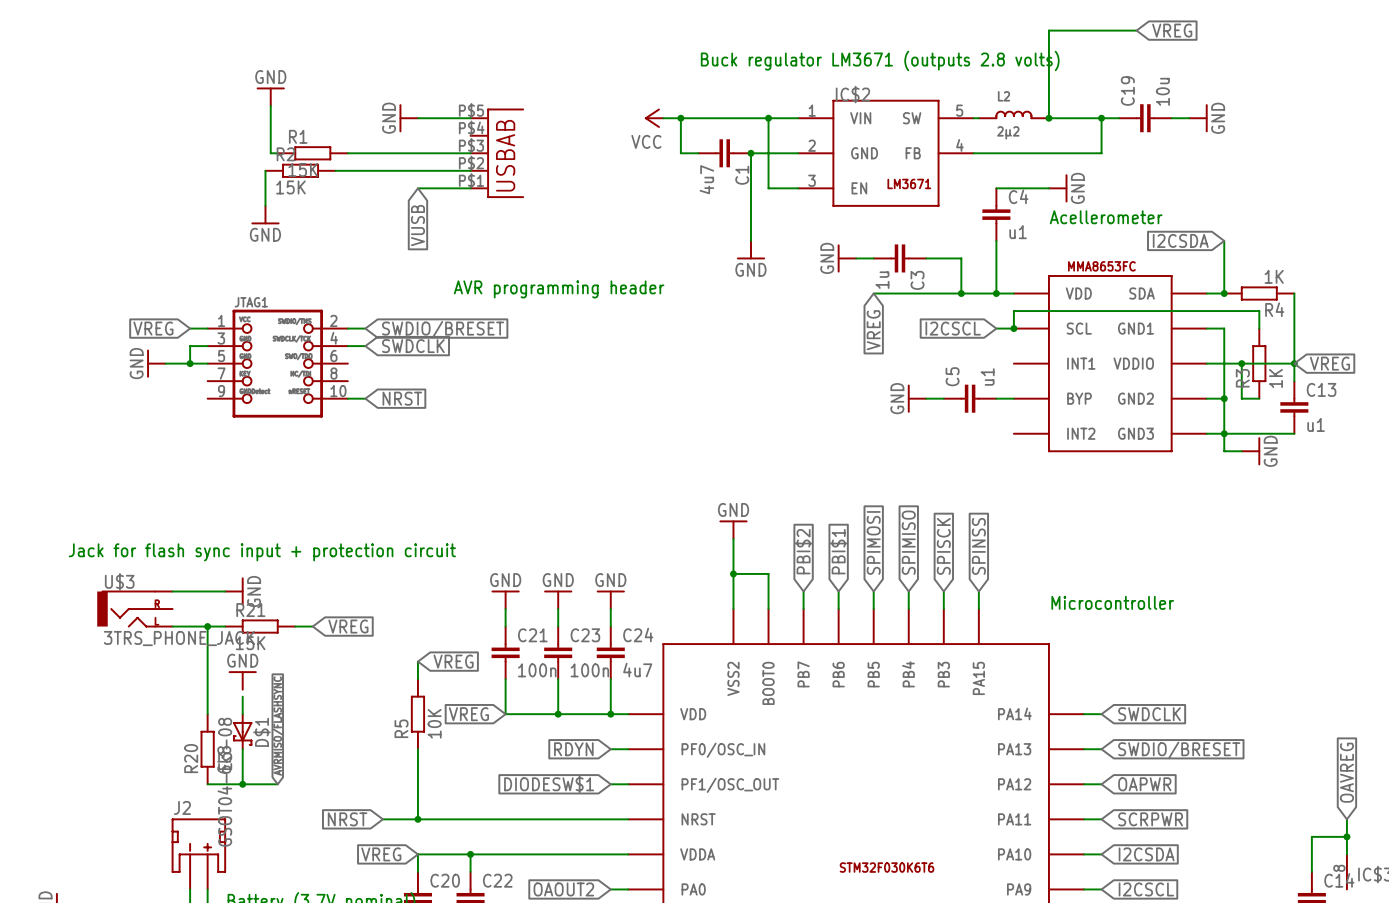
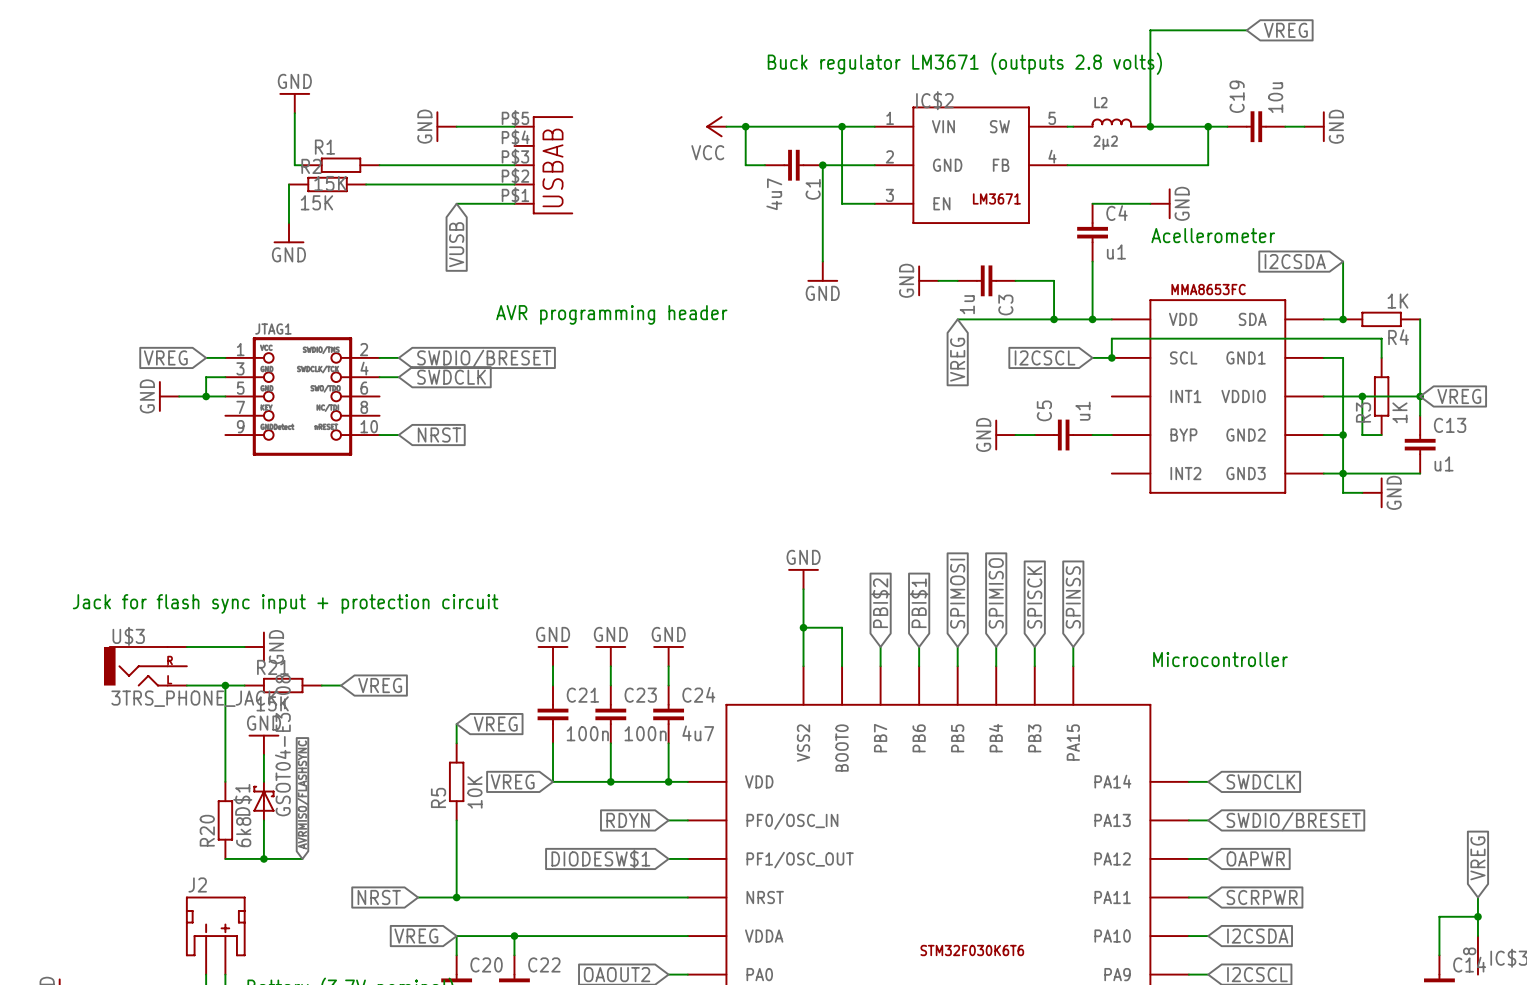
wire: none -> (263, 754) (263, 762)
D$1 rotation: 0° (242, 733) -> 180° (263, 798)
global label: OAVREG (1346, 772) -> VREG (1477, 858)

